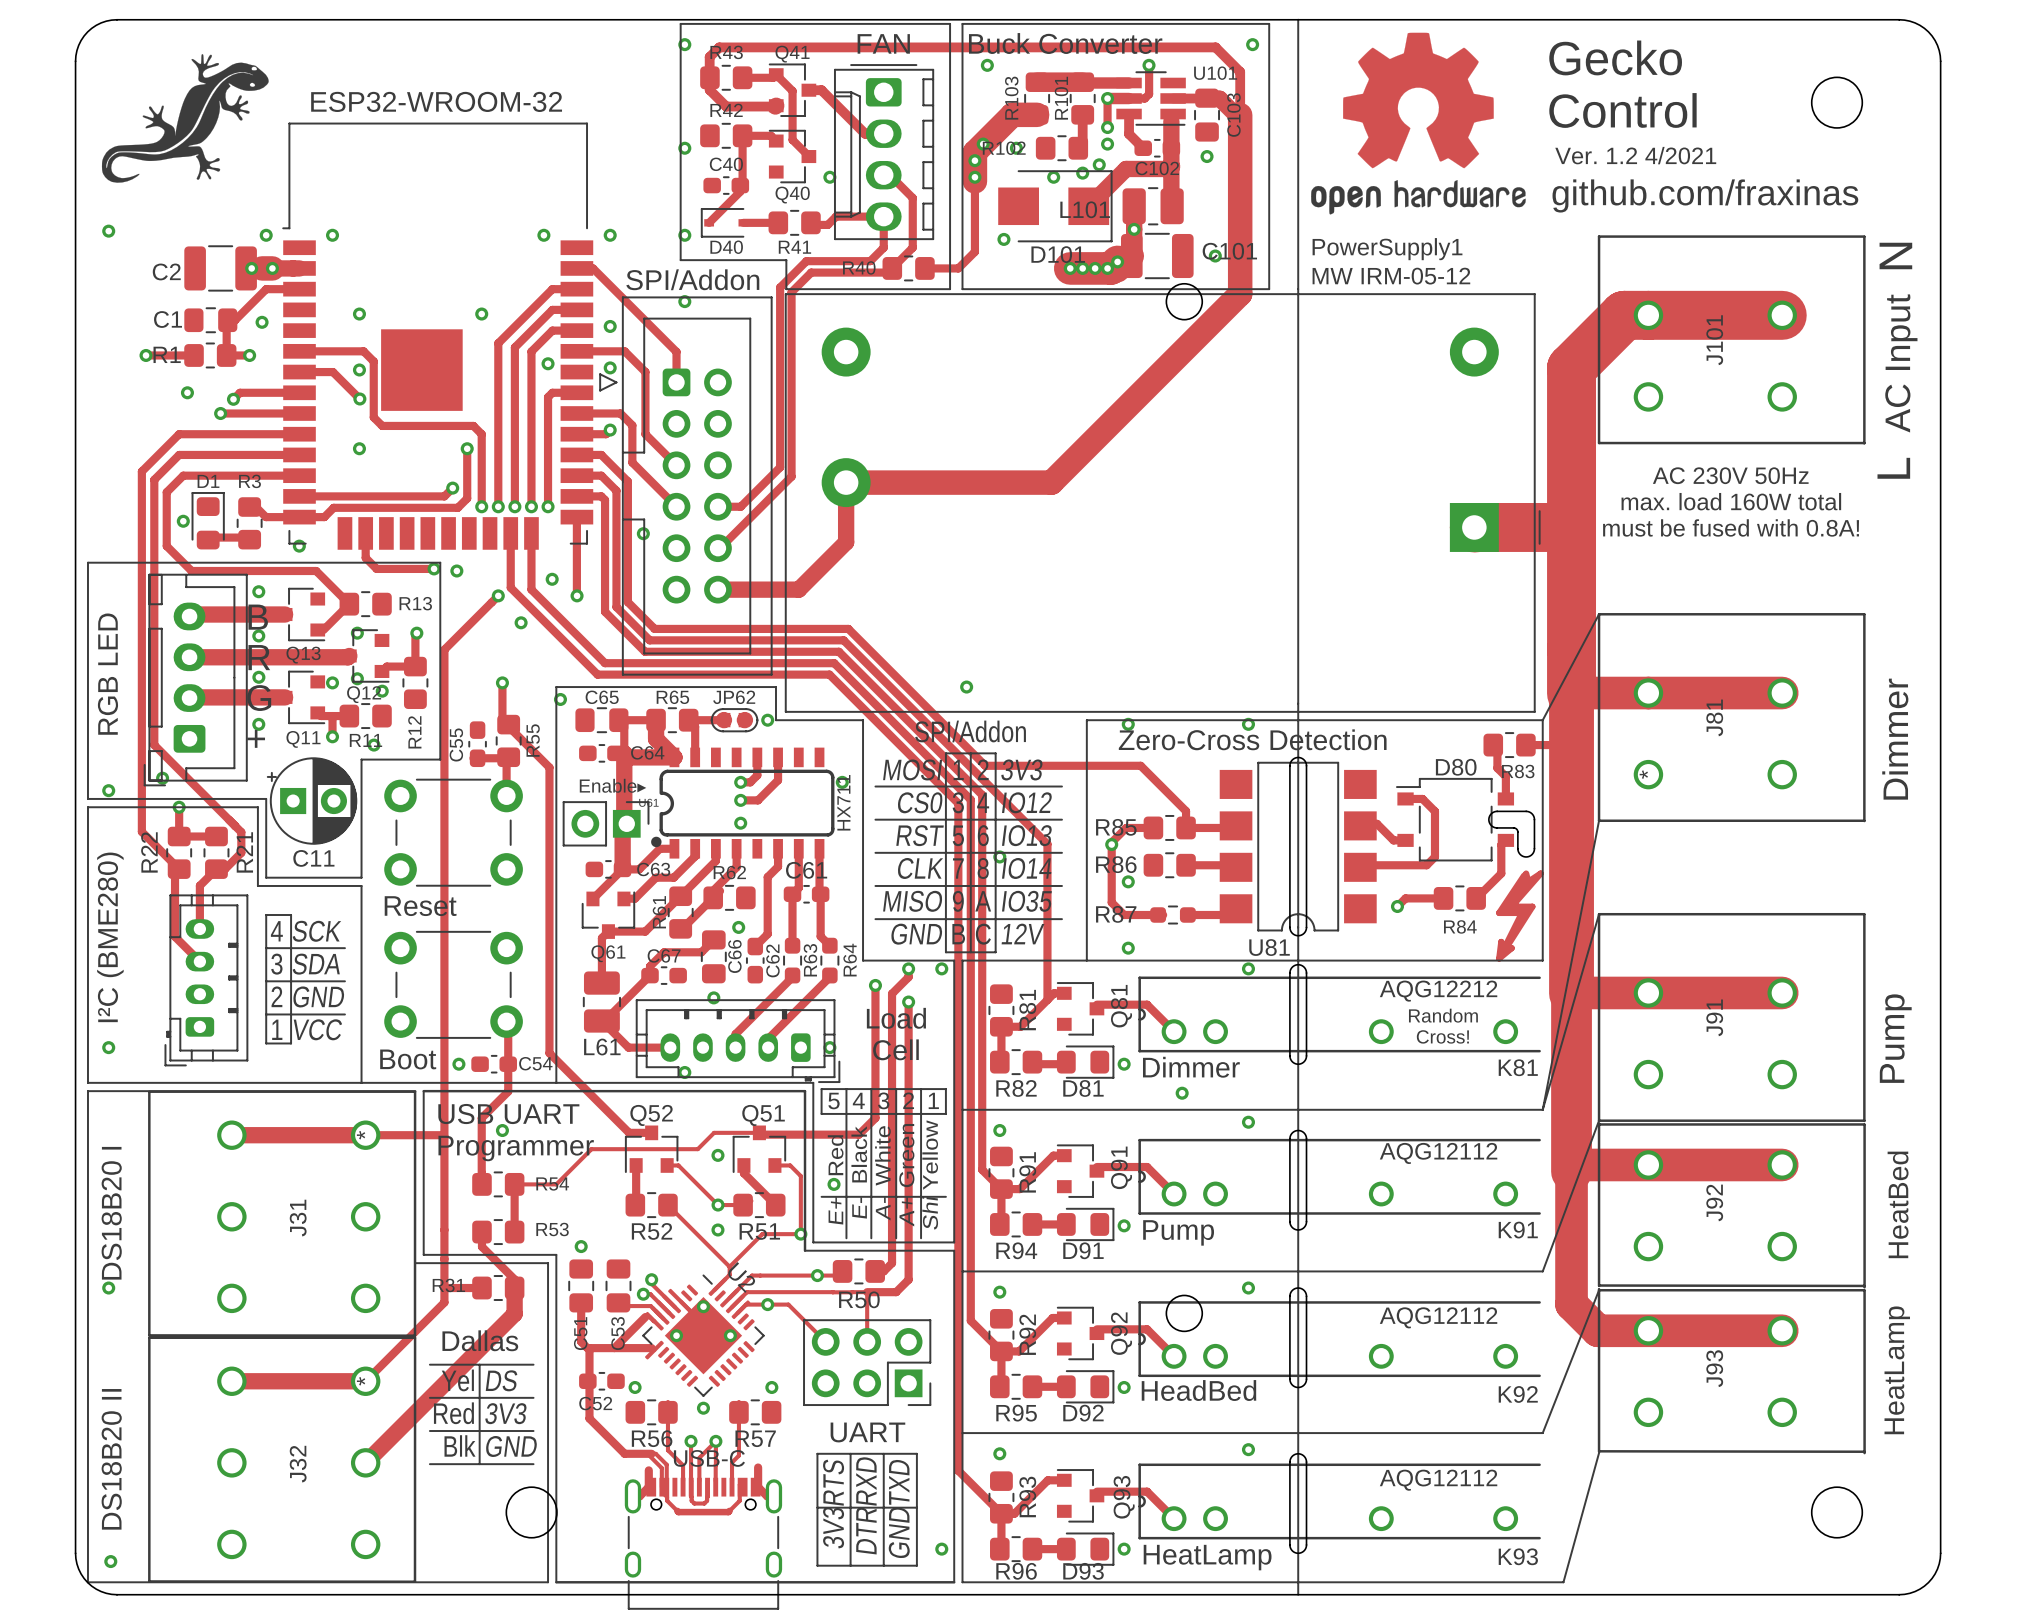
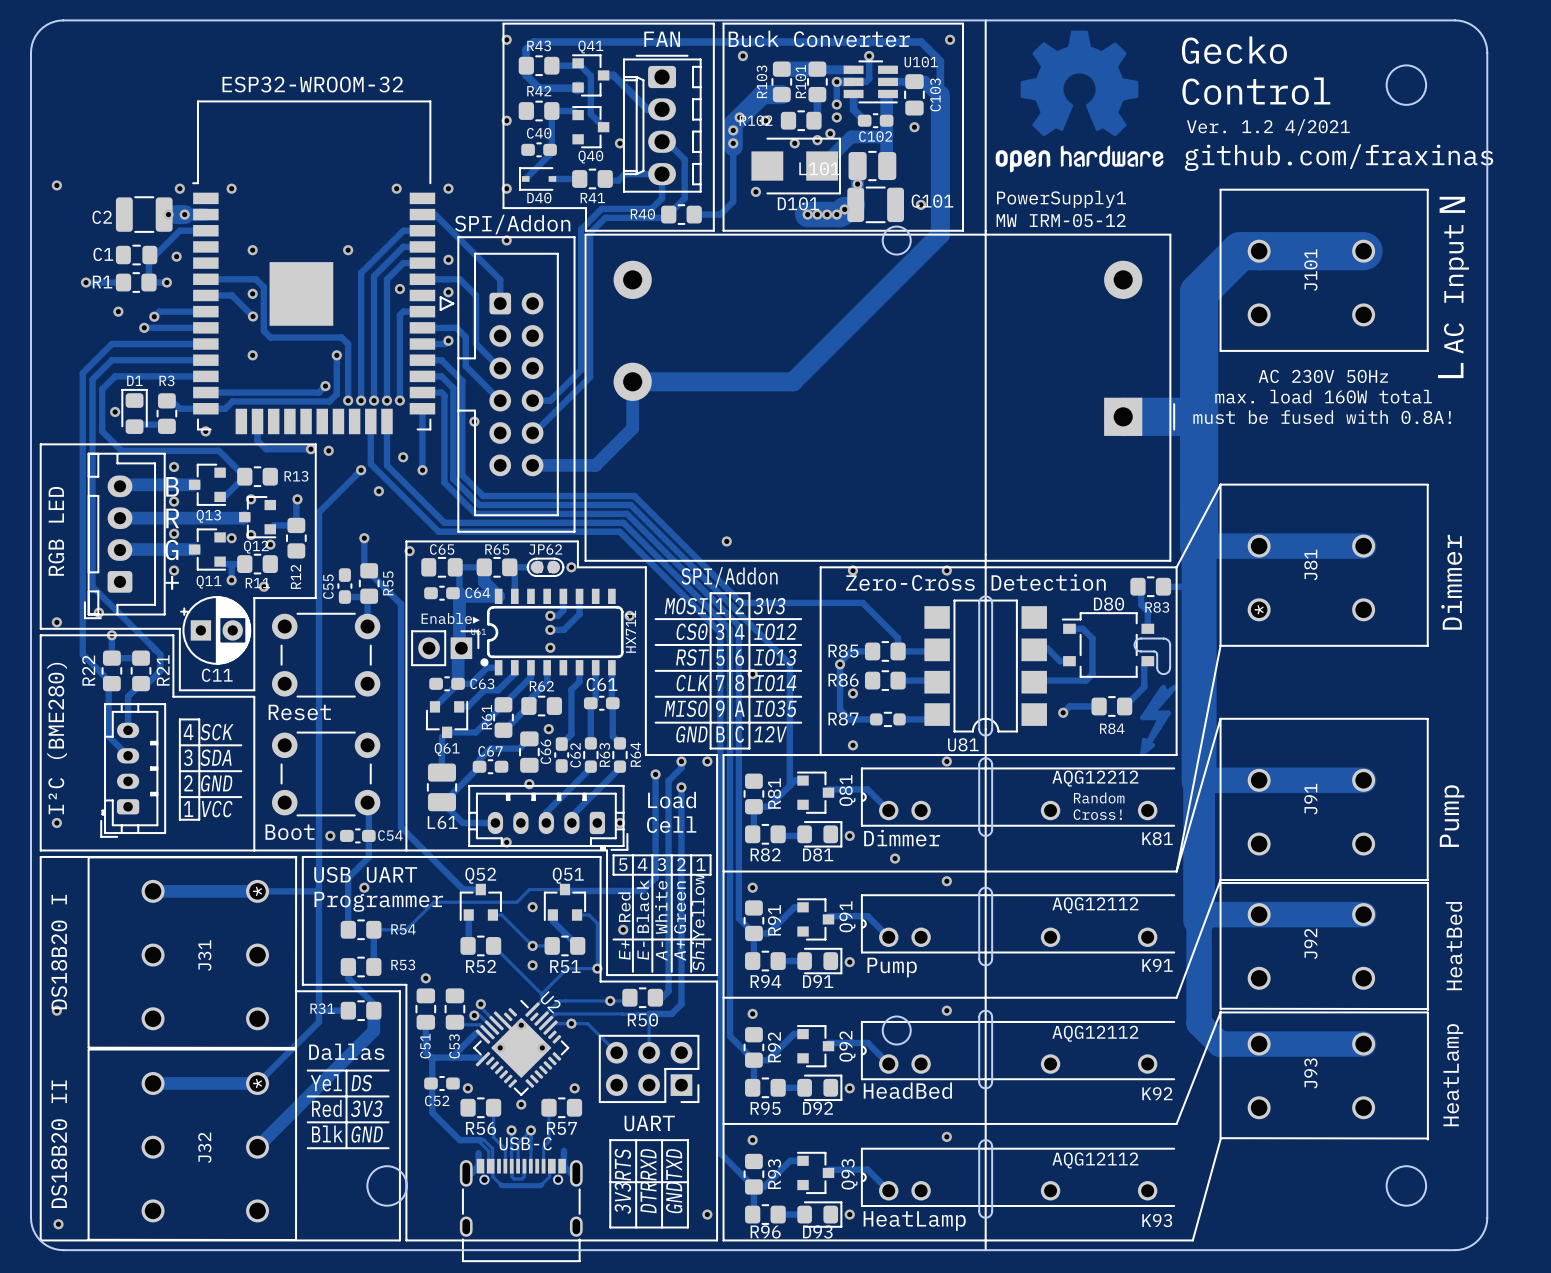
drawing: [101, 54, 269, 183] -> none

